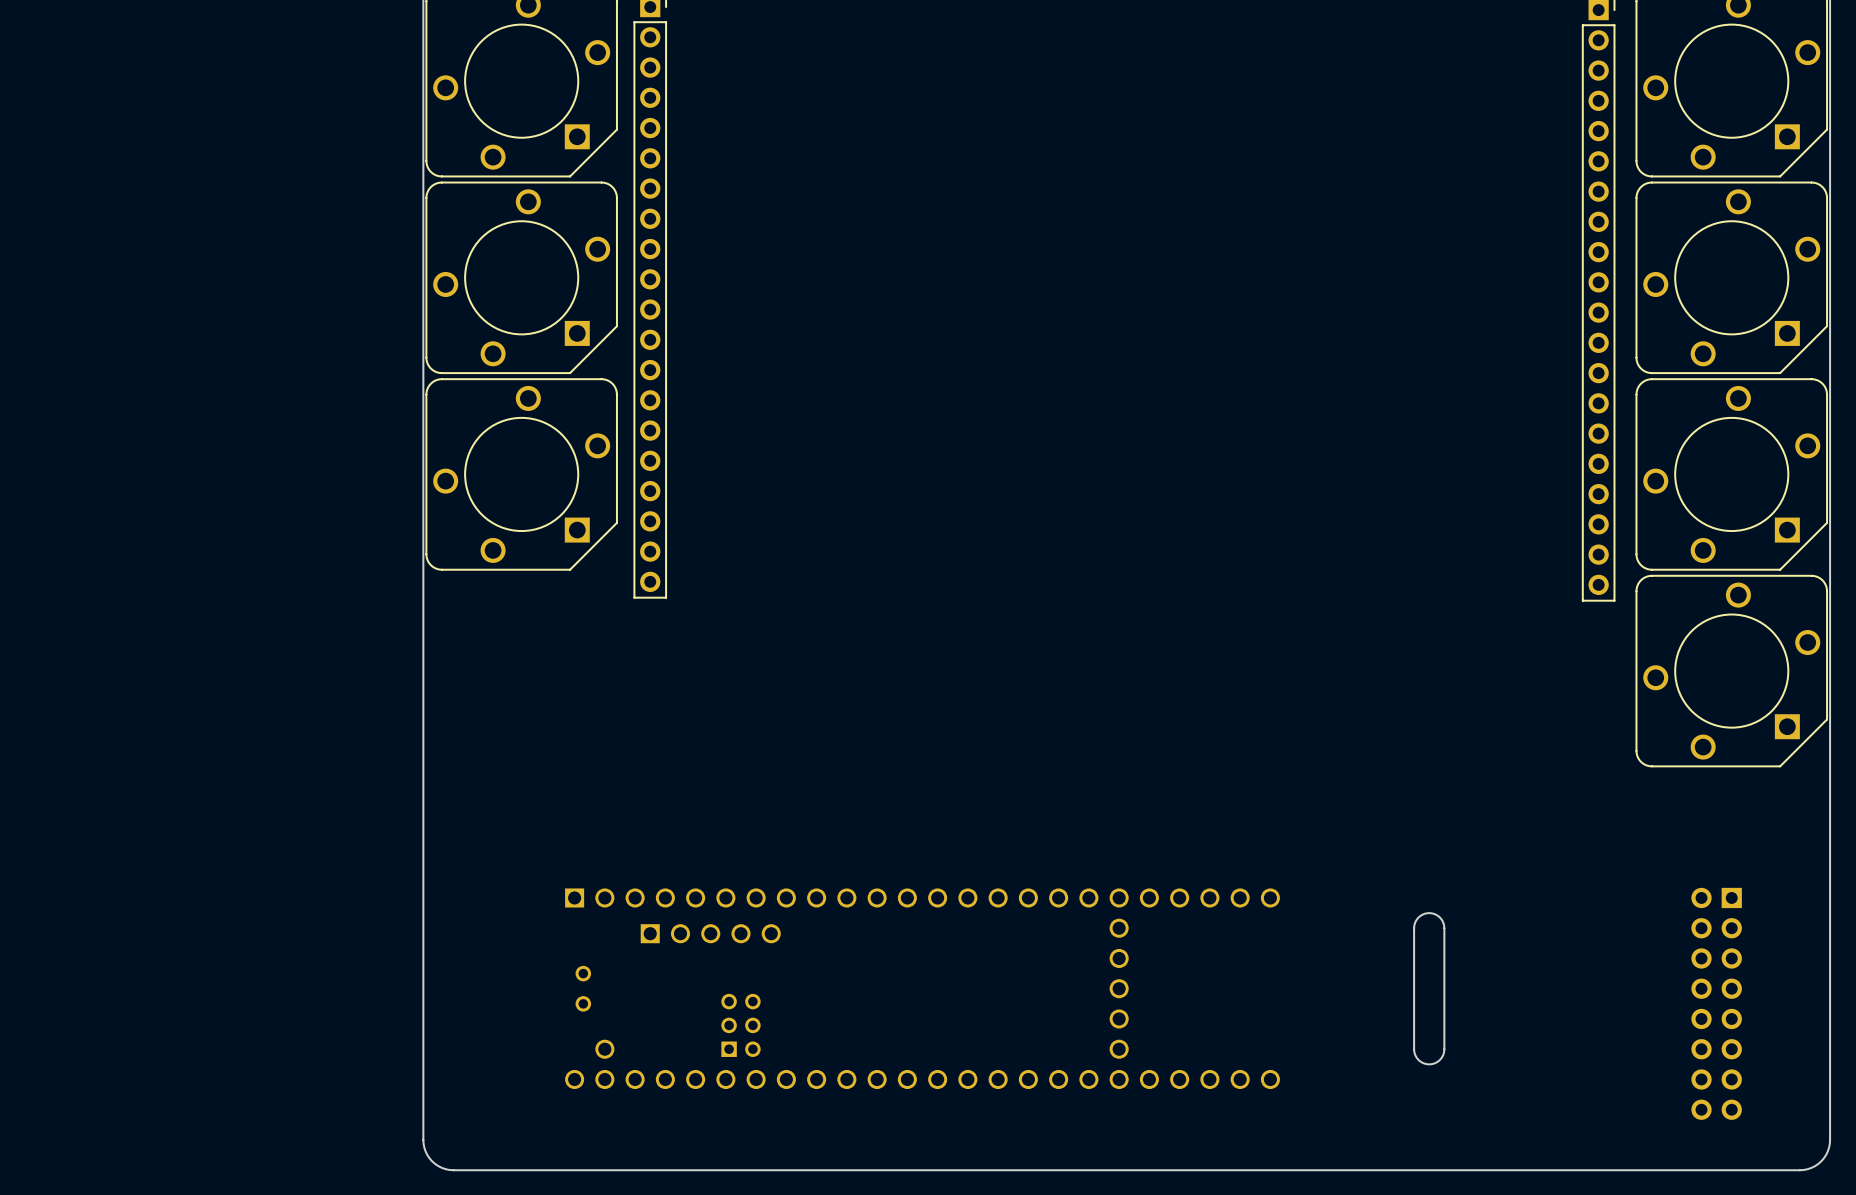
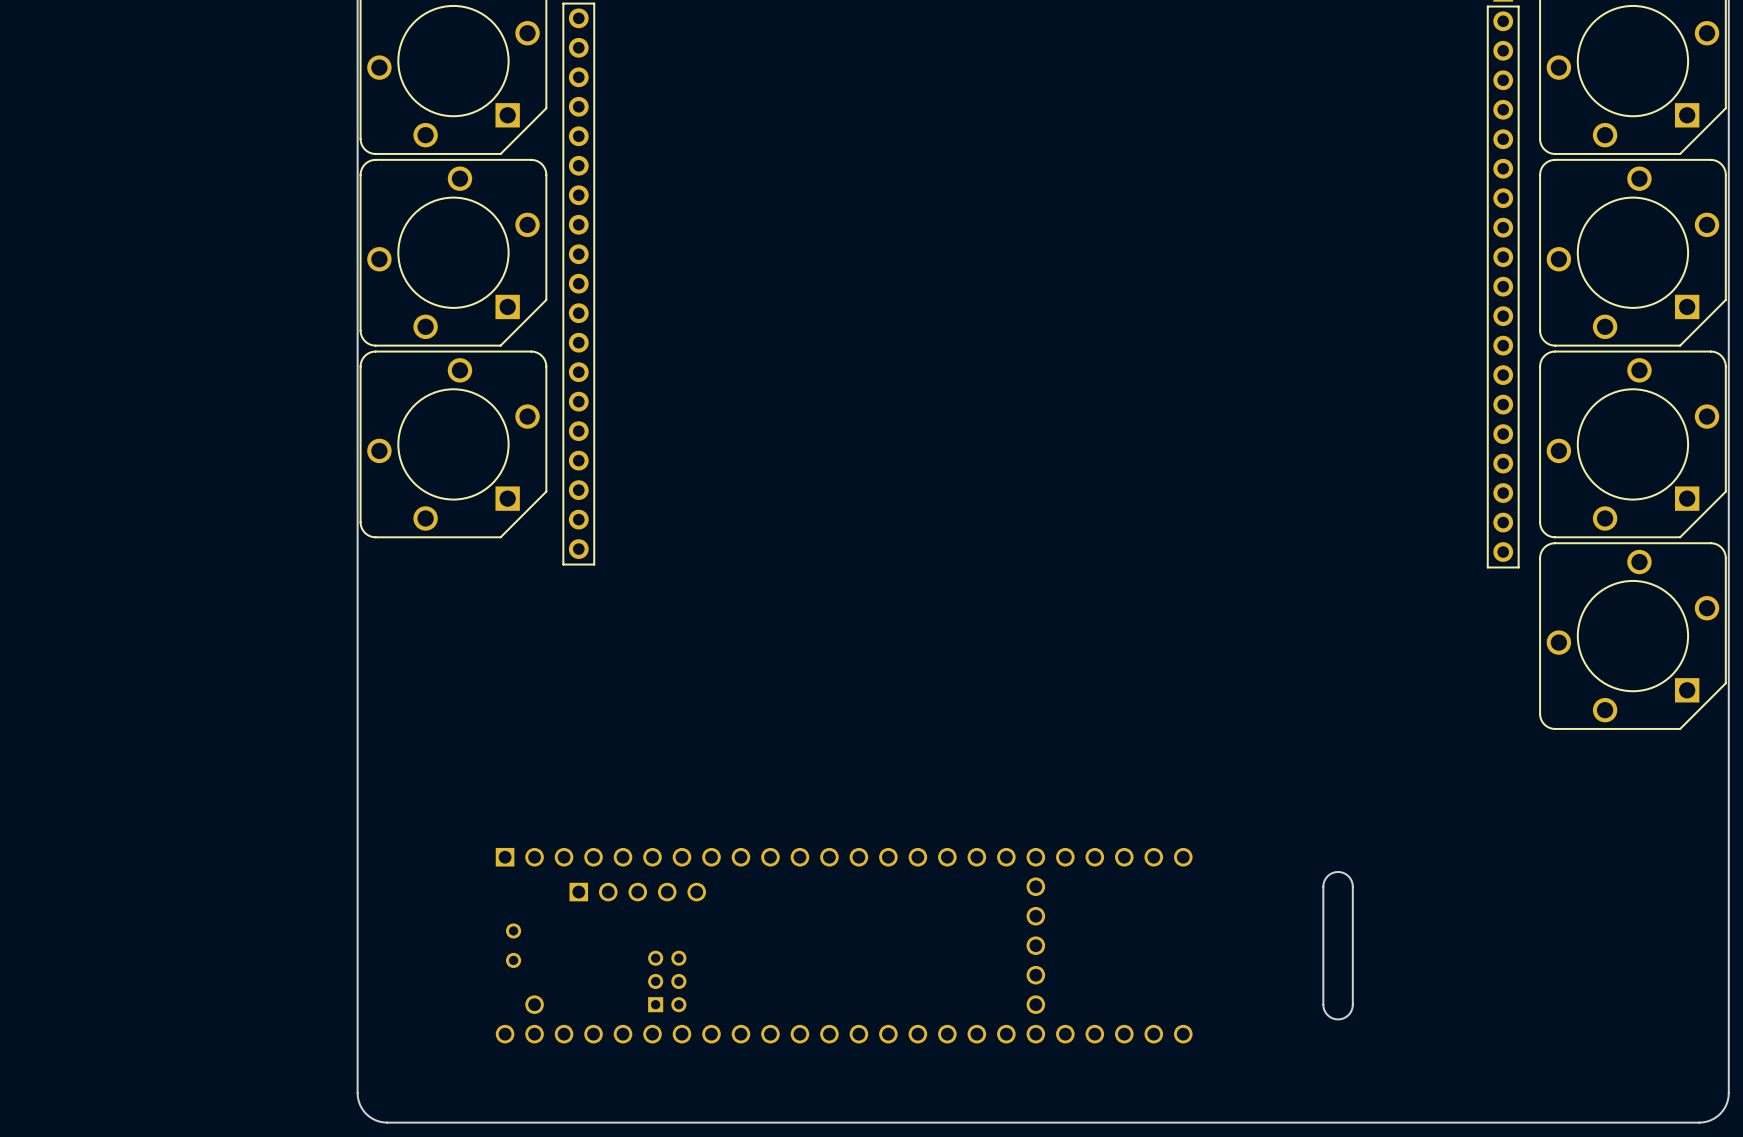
part: (1716, 1003) -> none

